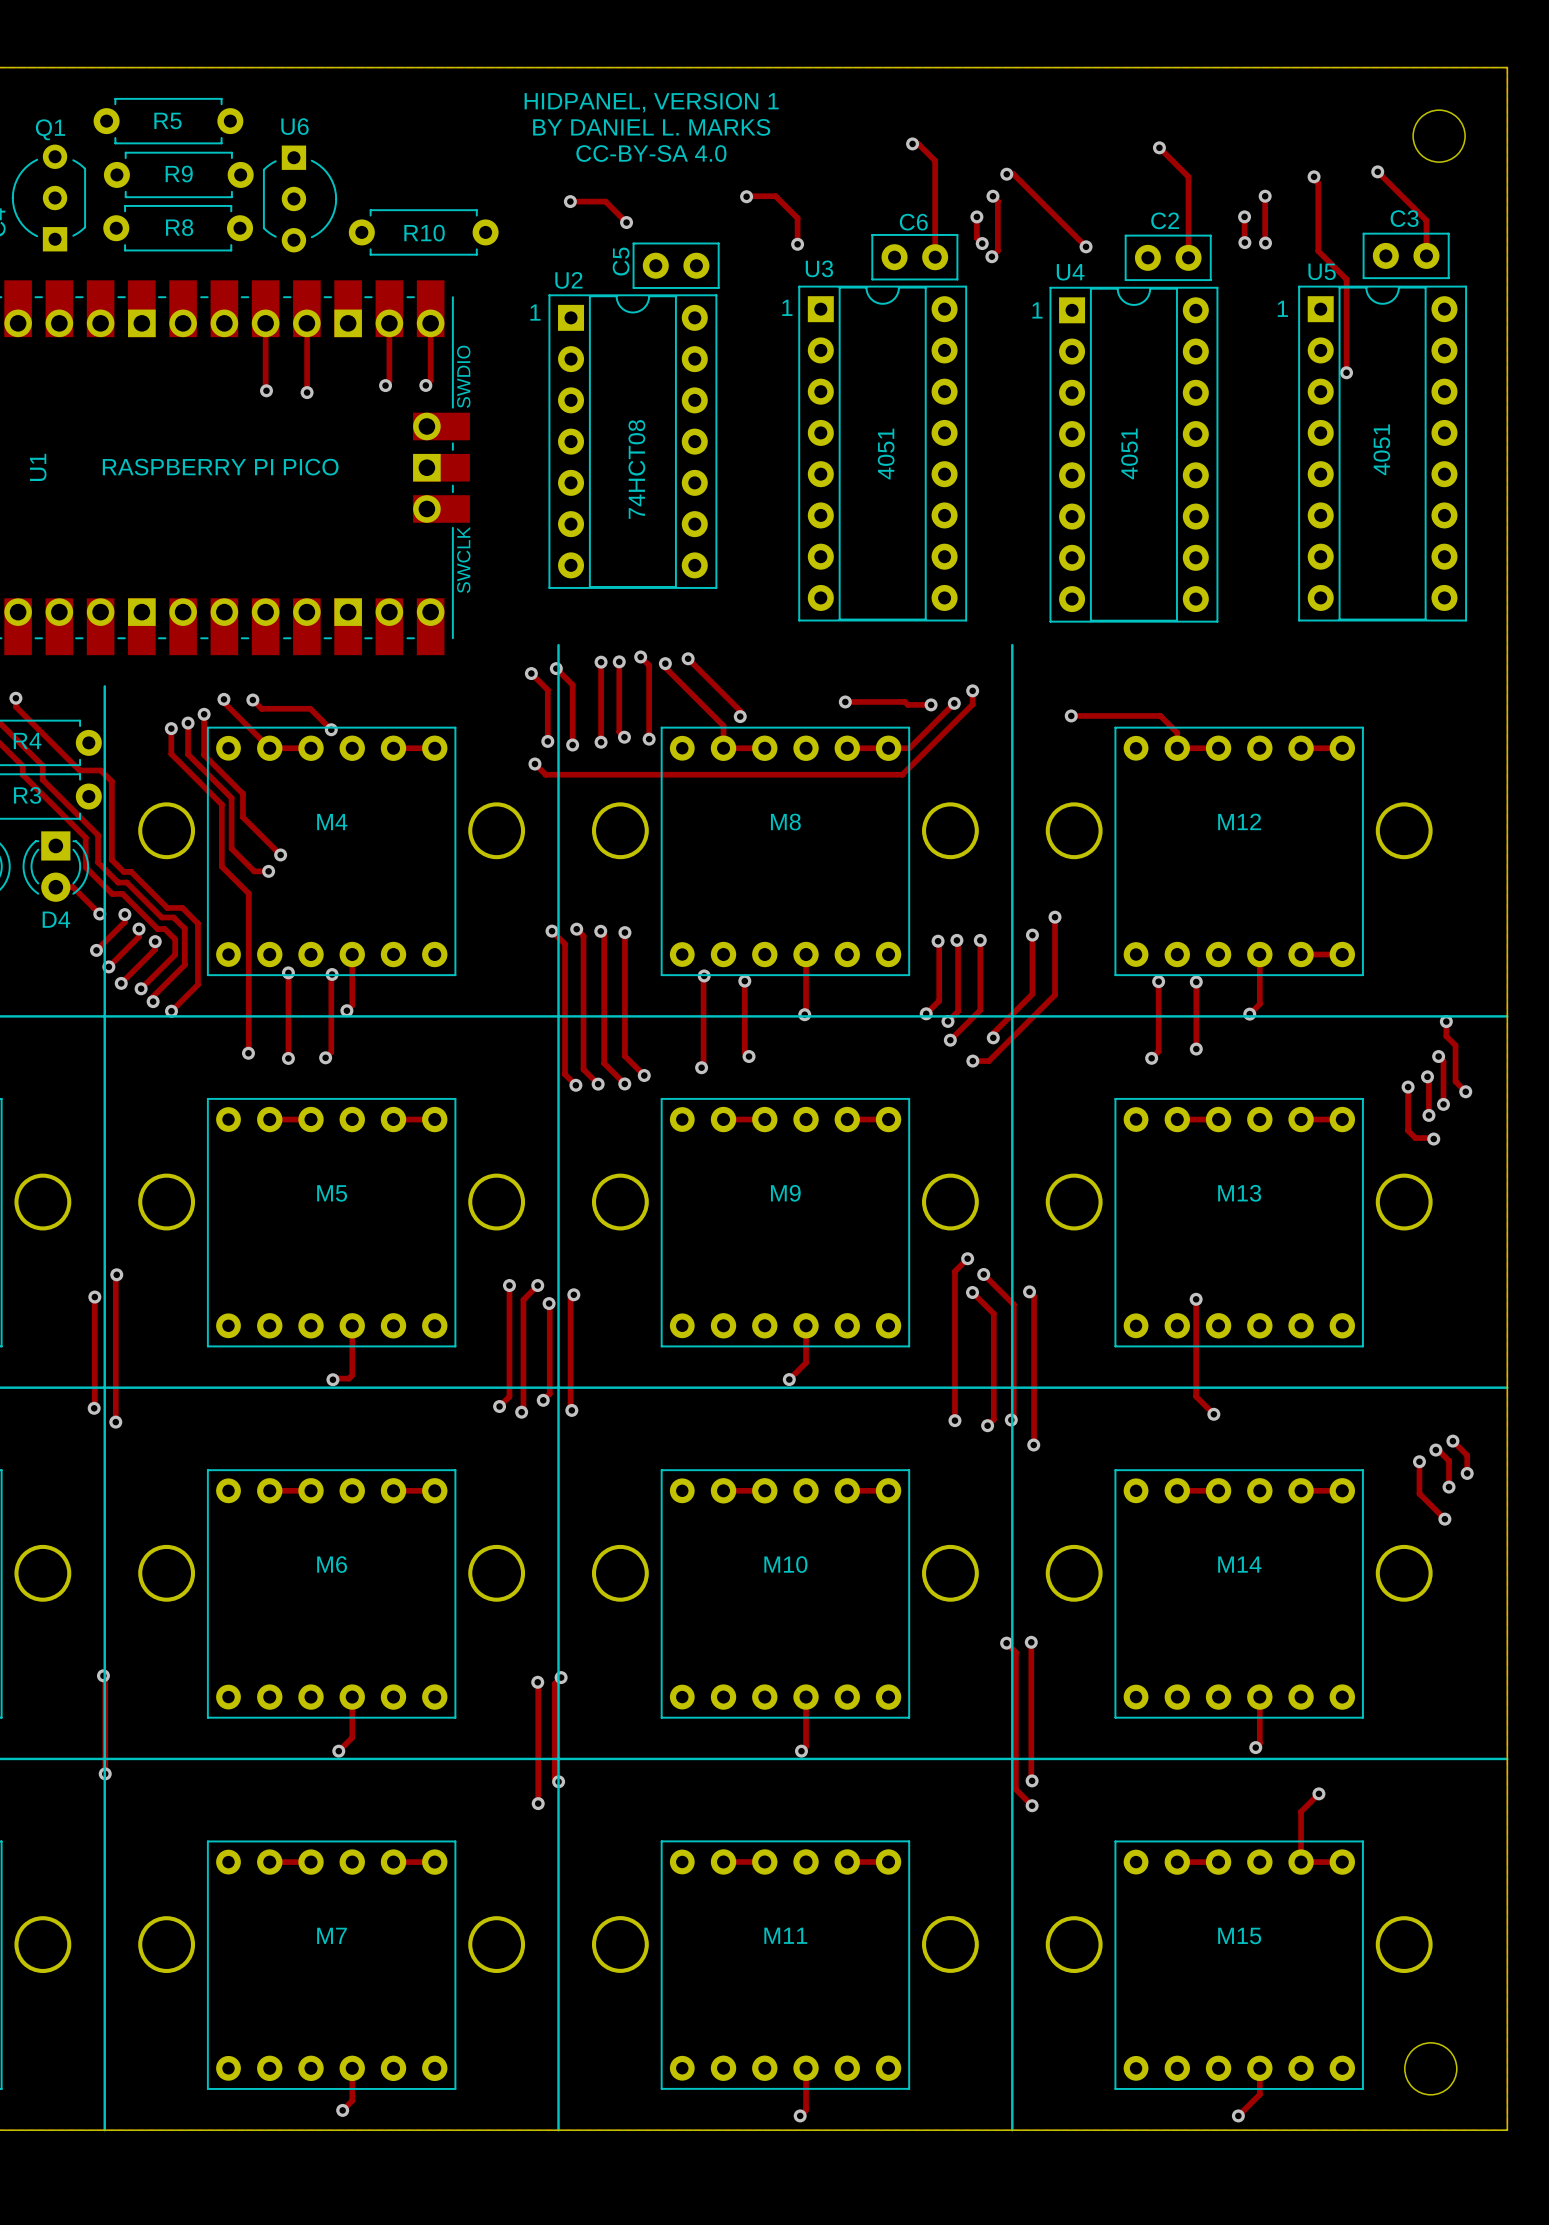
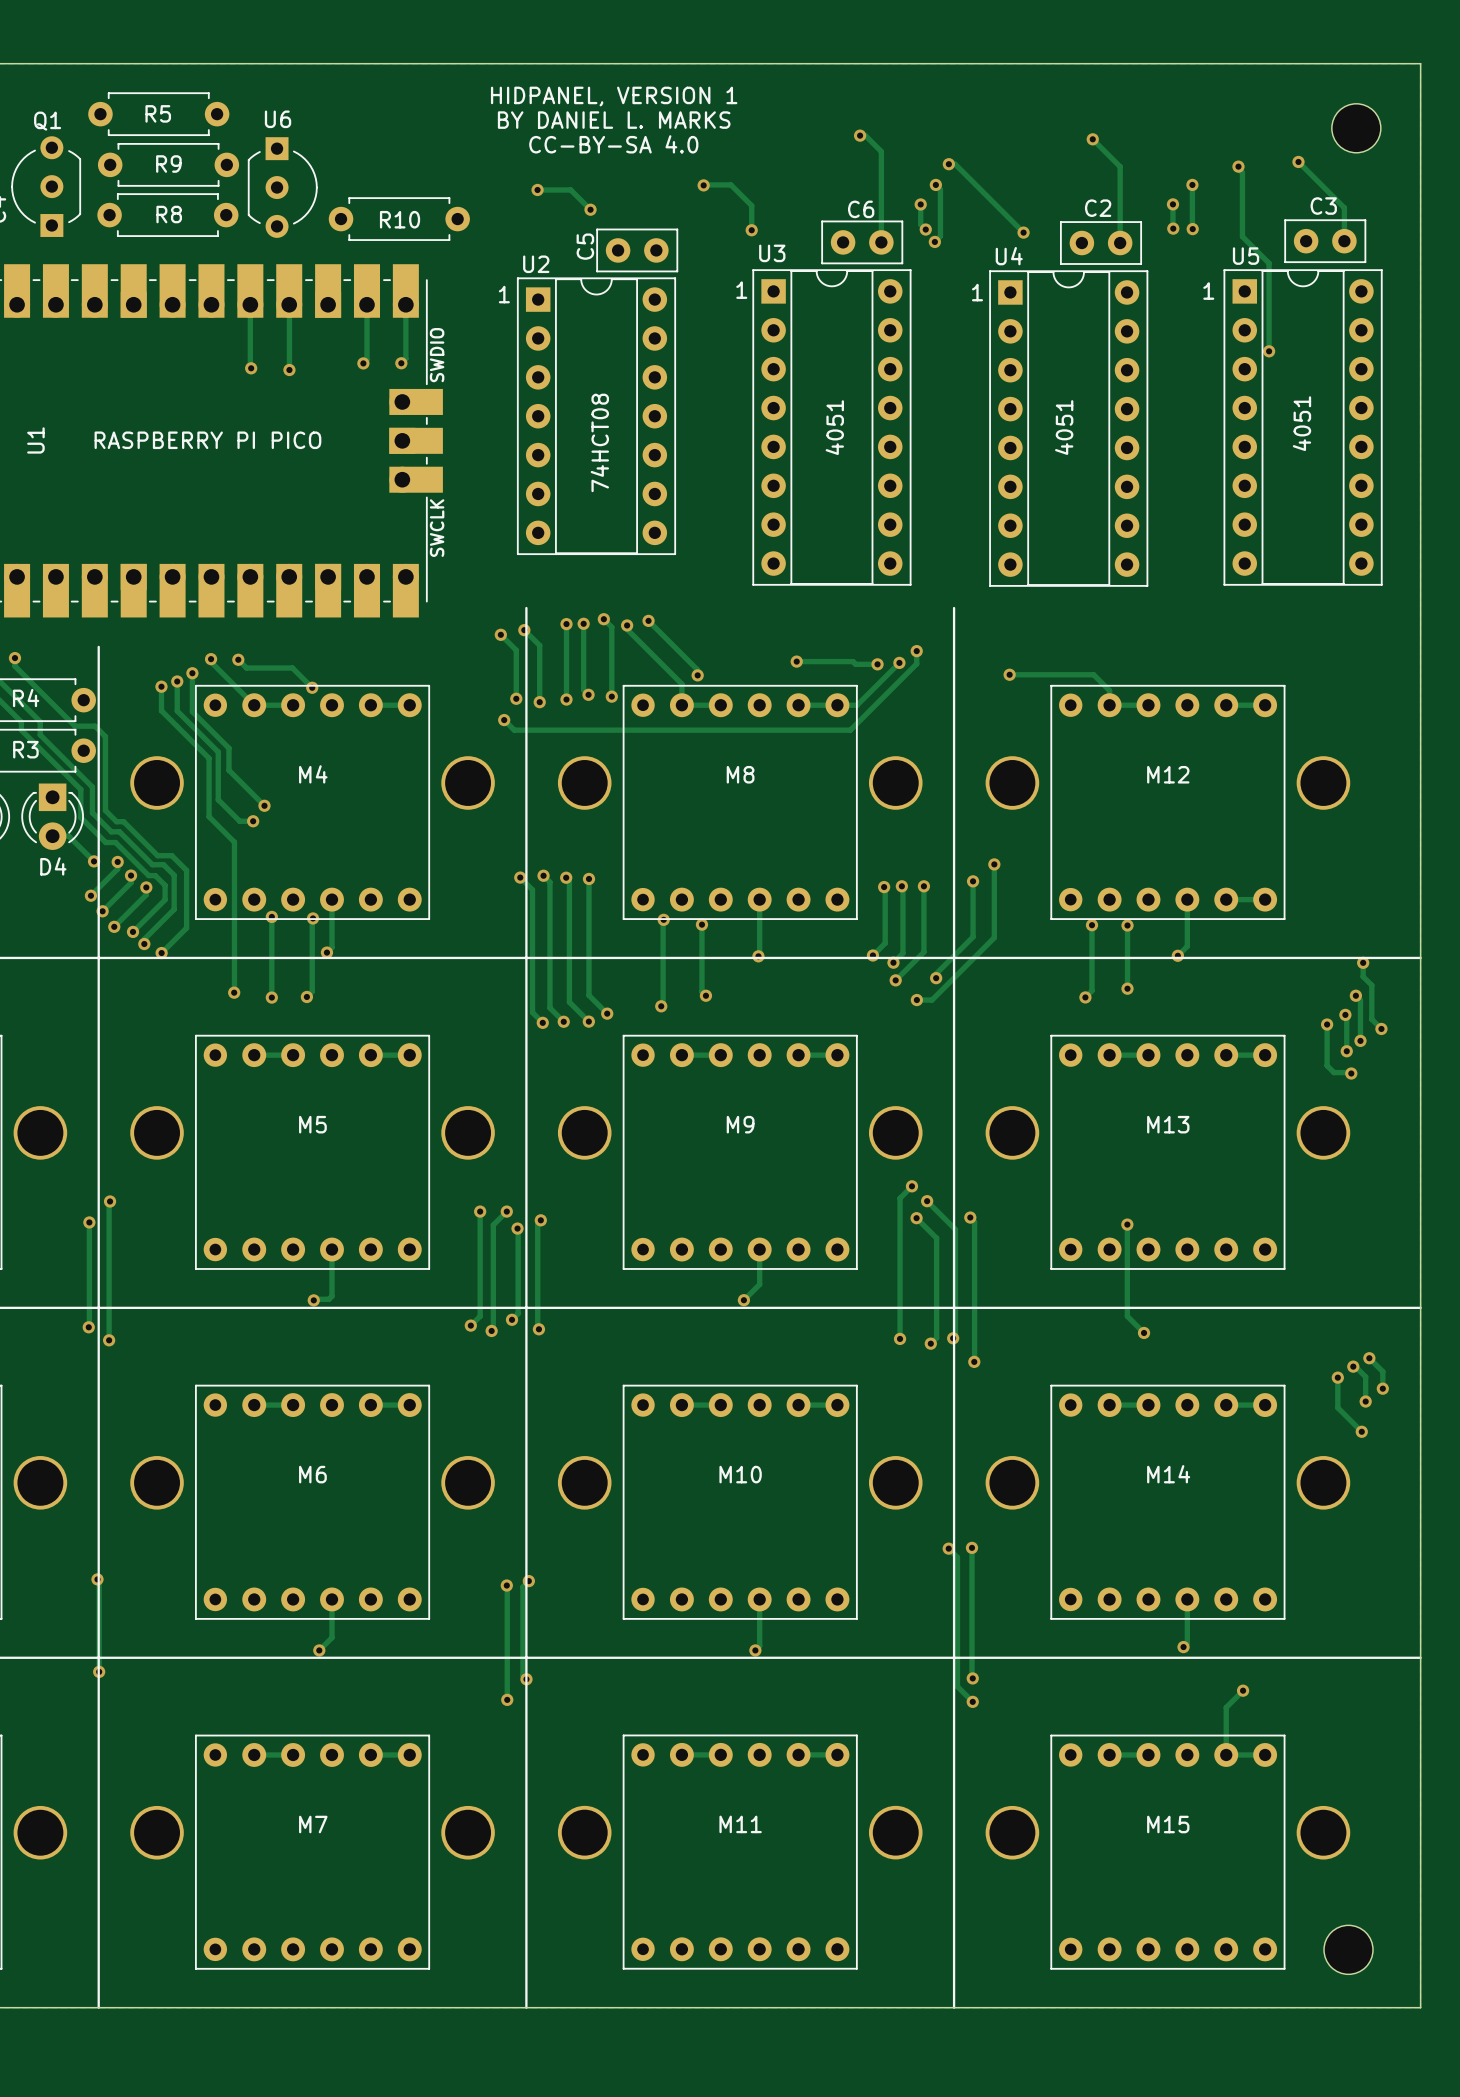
track: (352, 2068) (352, 2100) (342, 2110) -> none
track: (806, 2068) (806, 2110) (800, 2115) -> none
track: (1259, 2068) (1259, 2094) (1238, 2115) -> none
via: (342, 2110) -> none
via: (800, 2115) -> none
via: (1238, 2115) -> none

